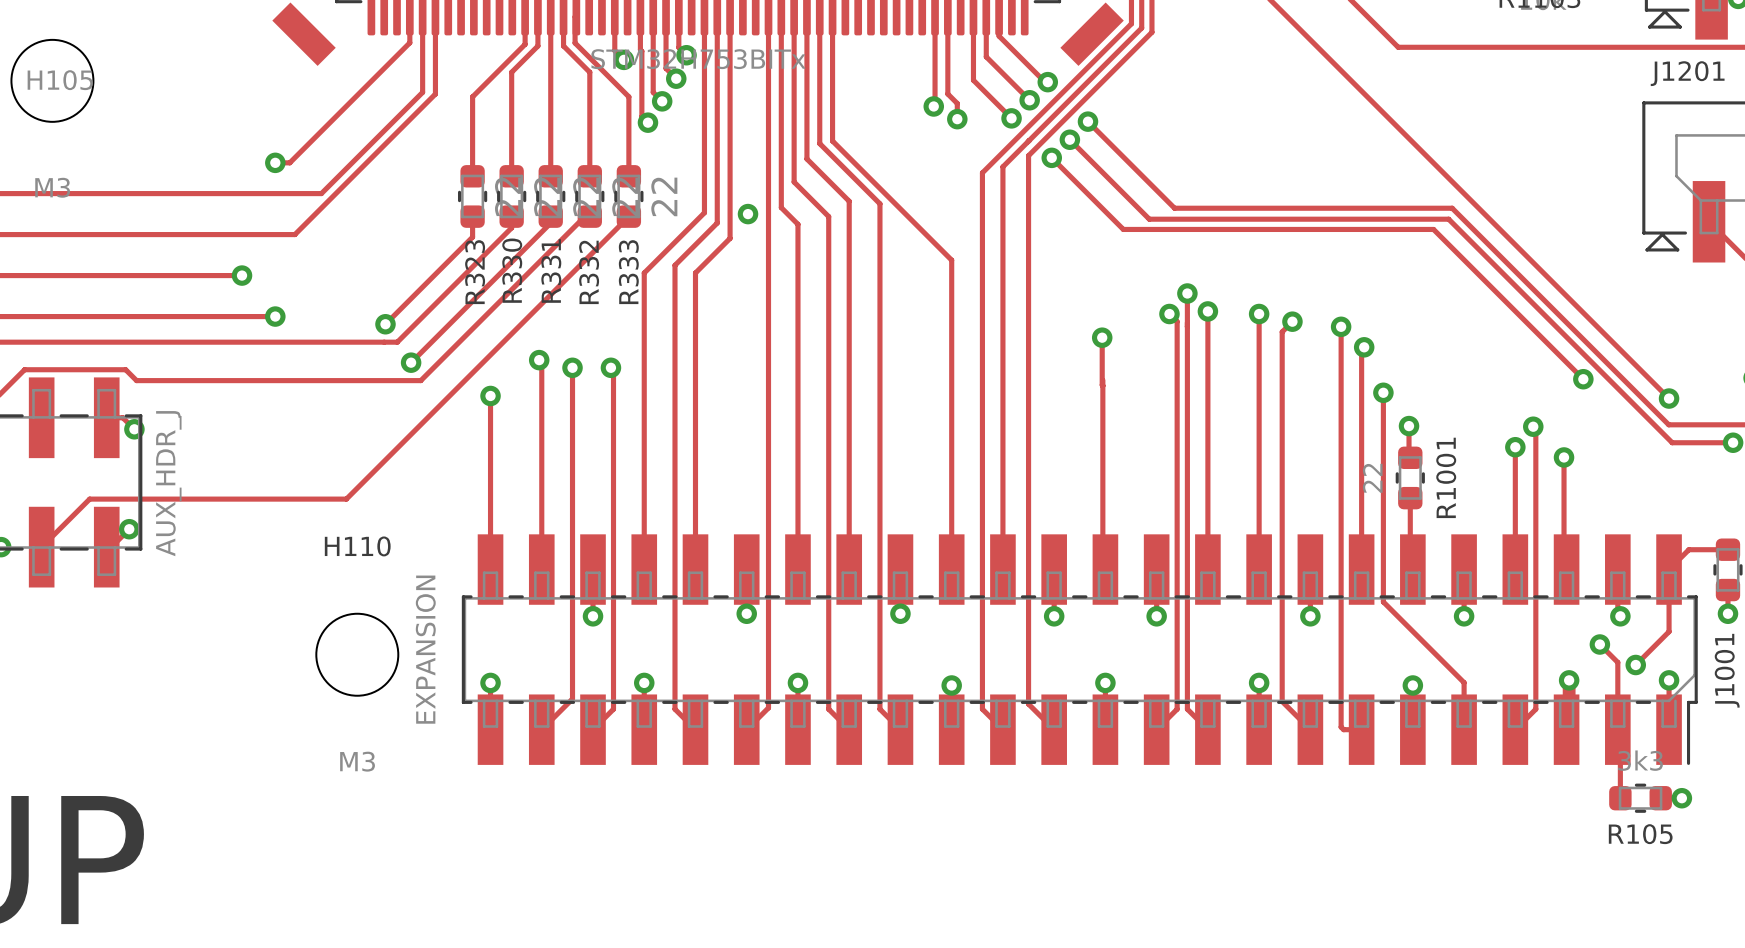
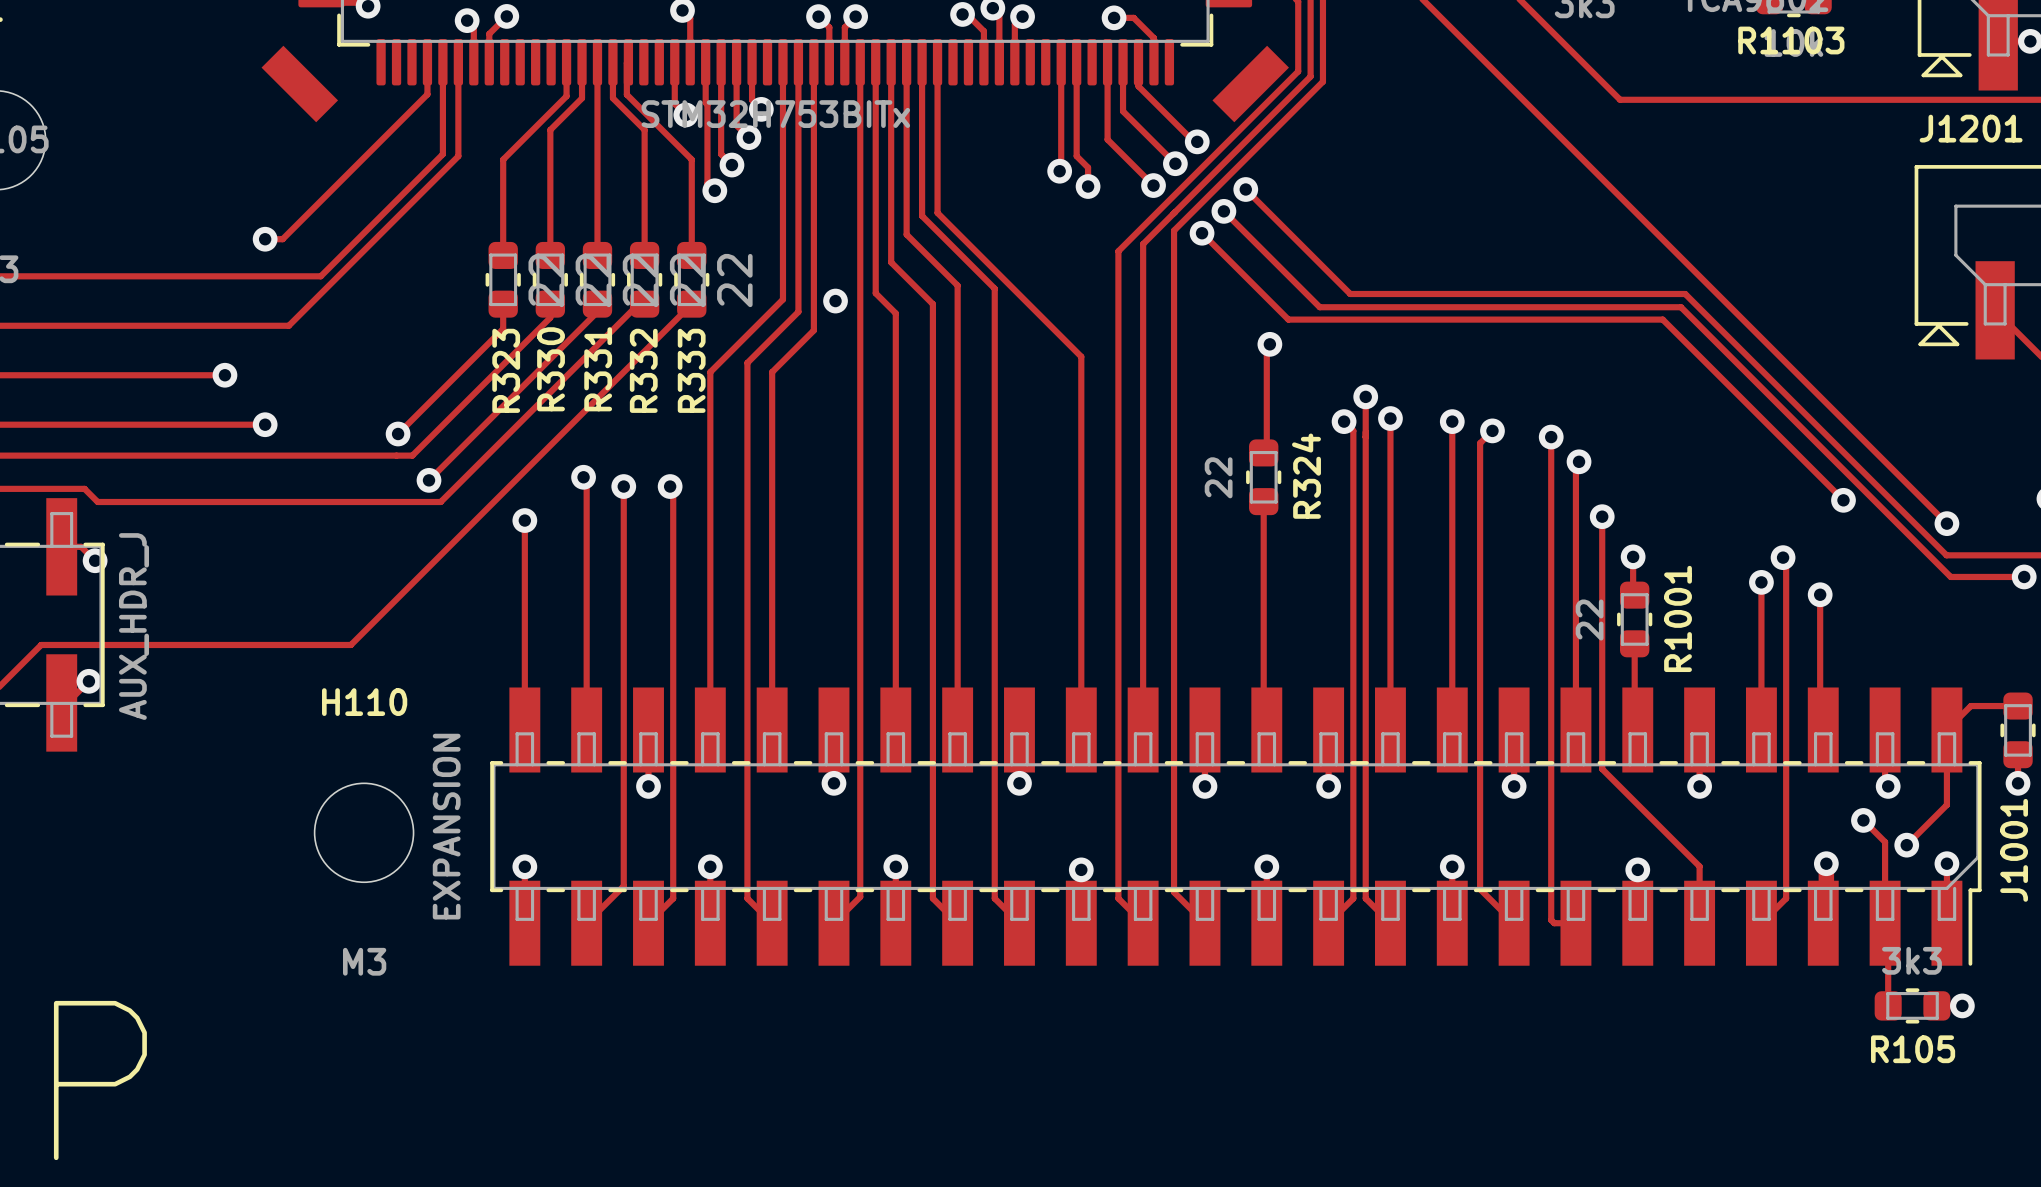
track: none -> (1269, 344) (1266, 341) (1266, 449) (1263, 452)
track: (1102, 337) (1102, 385) -> none
via position: (1102, 337) -> (1269, 344)
R324: none -> 22 (1263, 477)

